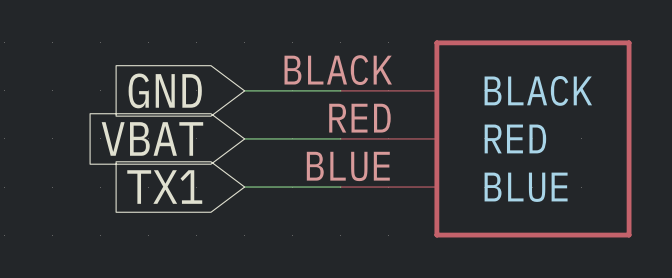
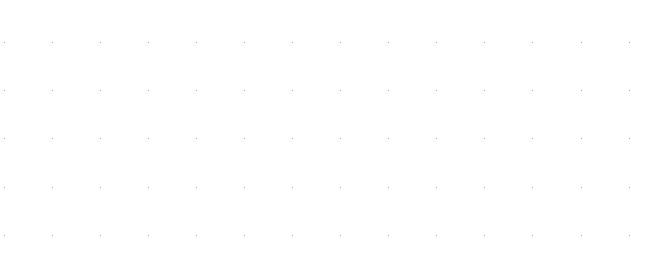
global label: GND (165, 90) -> none
wire: (244, 90) (340, 90) -> none
global label: VBAT (152, 138) -> none
wire: (244, 138) (340, 138) -> none
part: (486, 138) -> none
global label: TX1 (164, 187) -> none
wire: (244, 187) (340, 187) -> none

